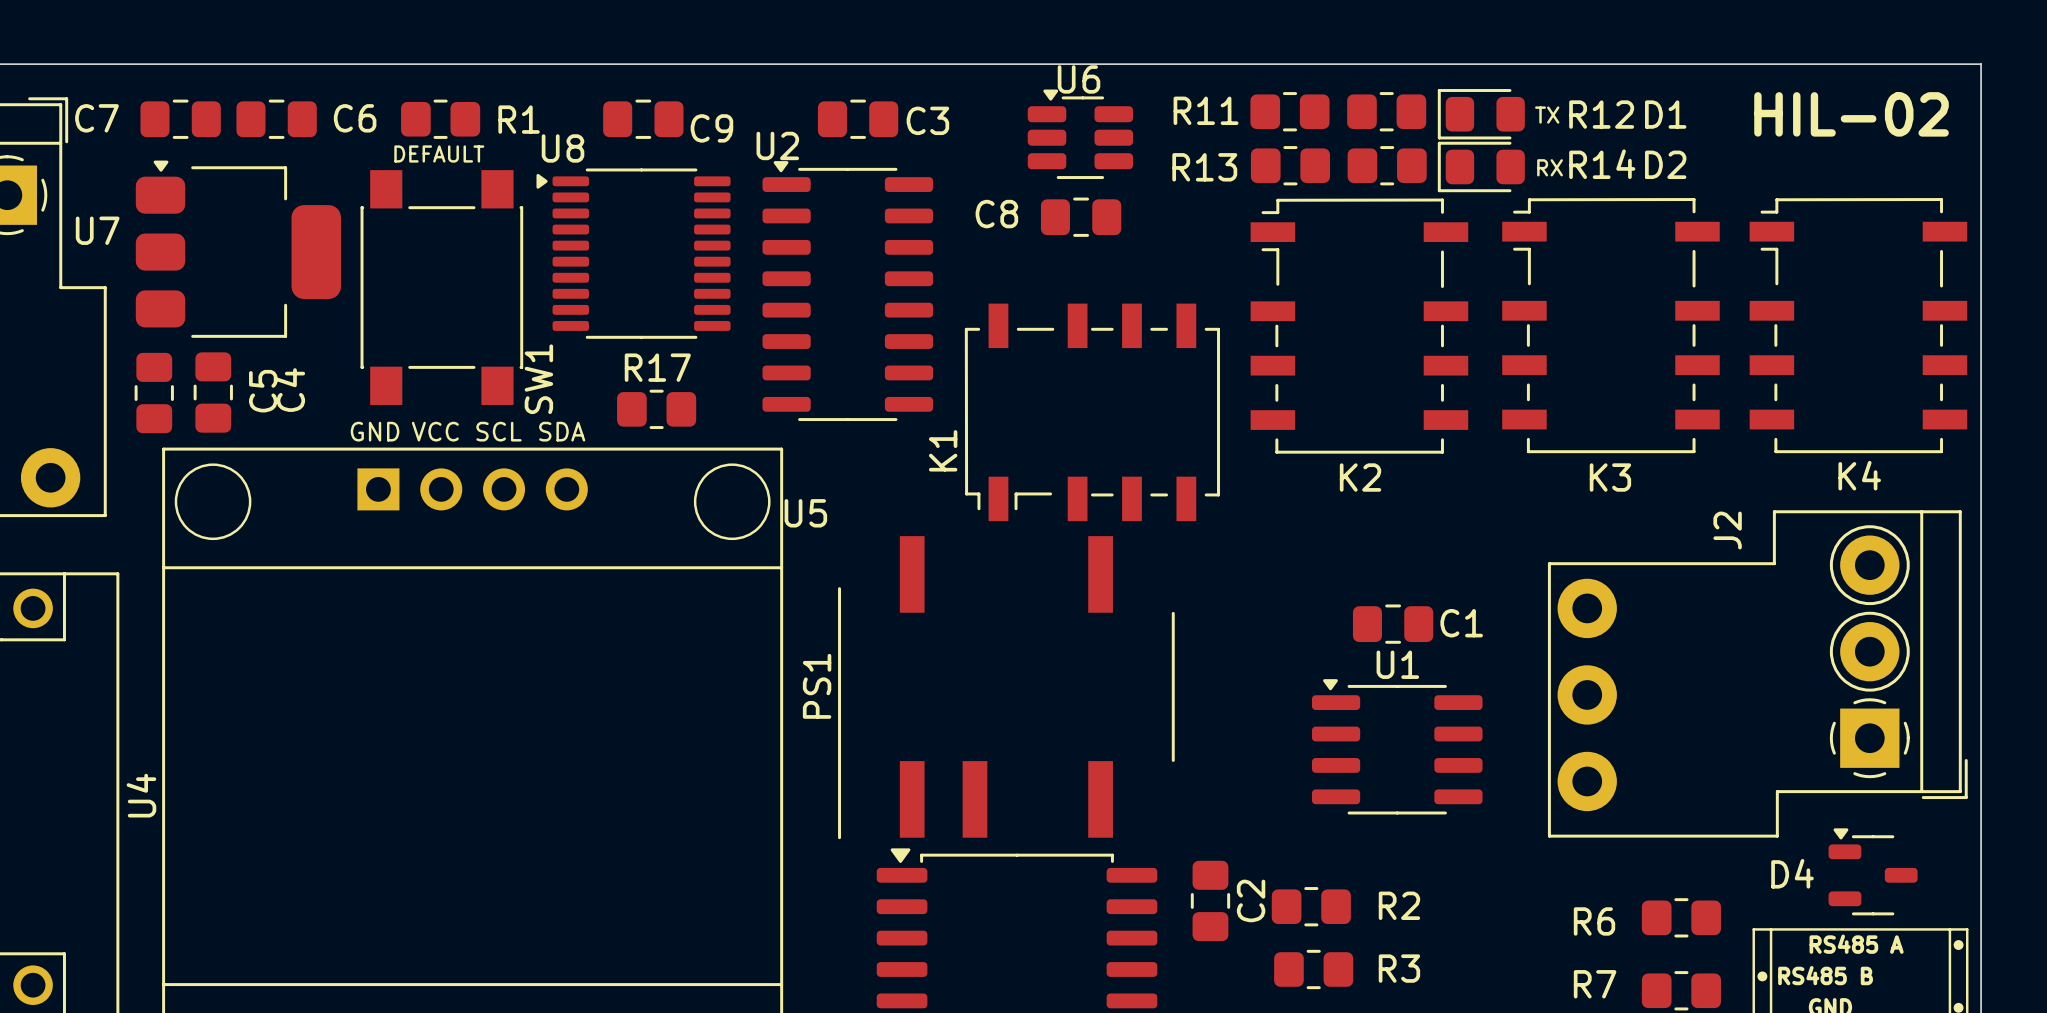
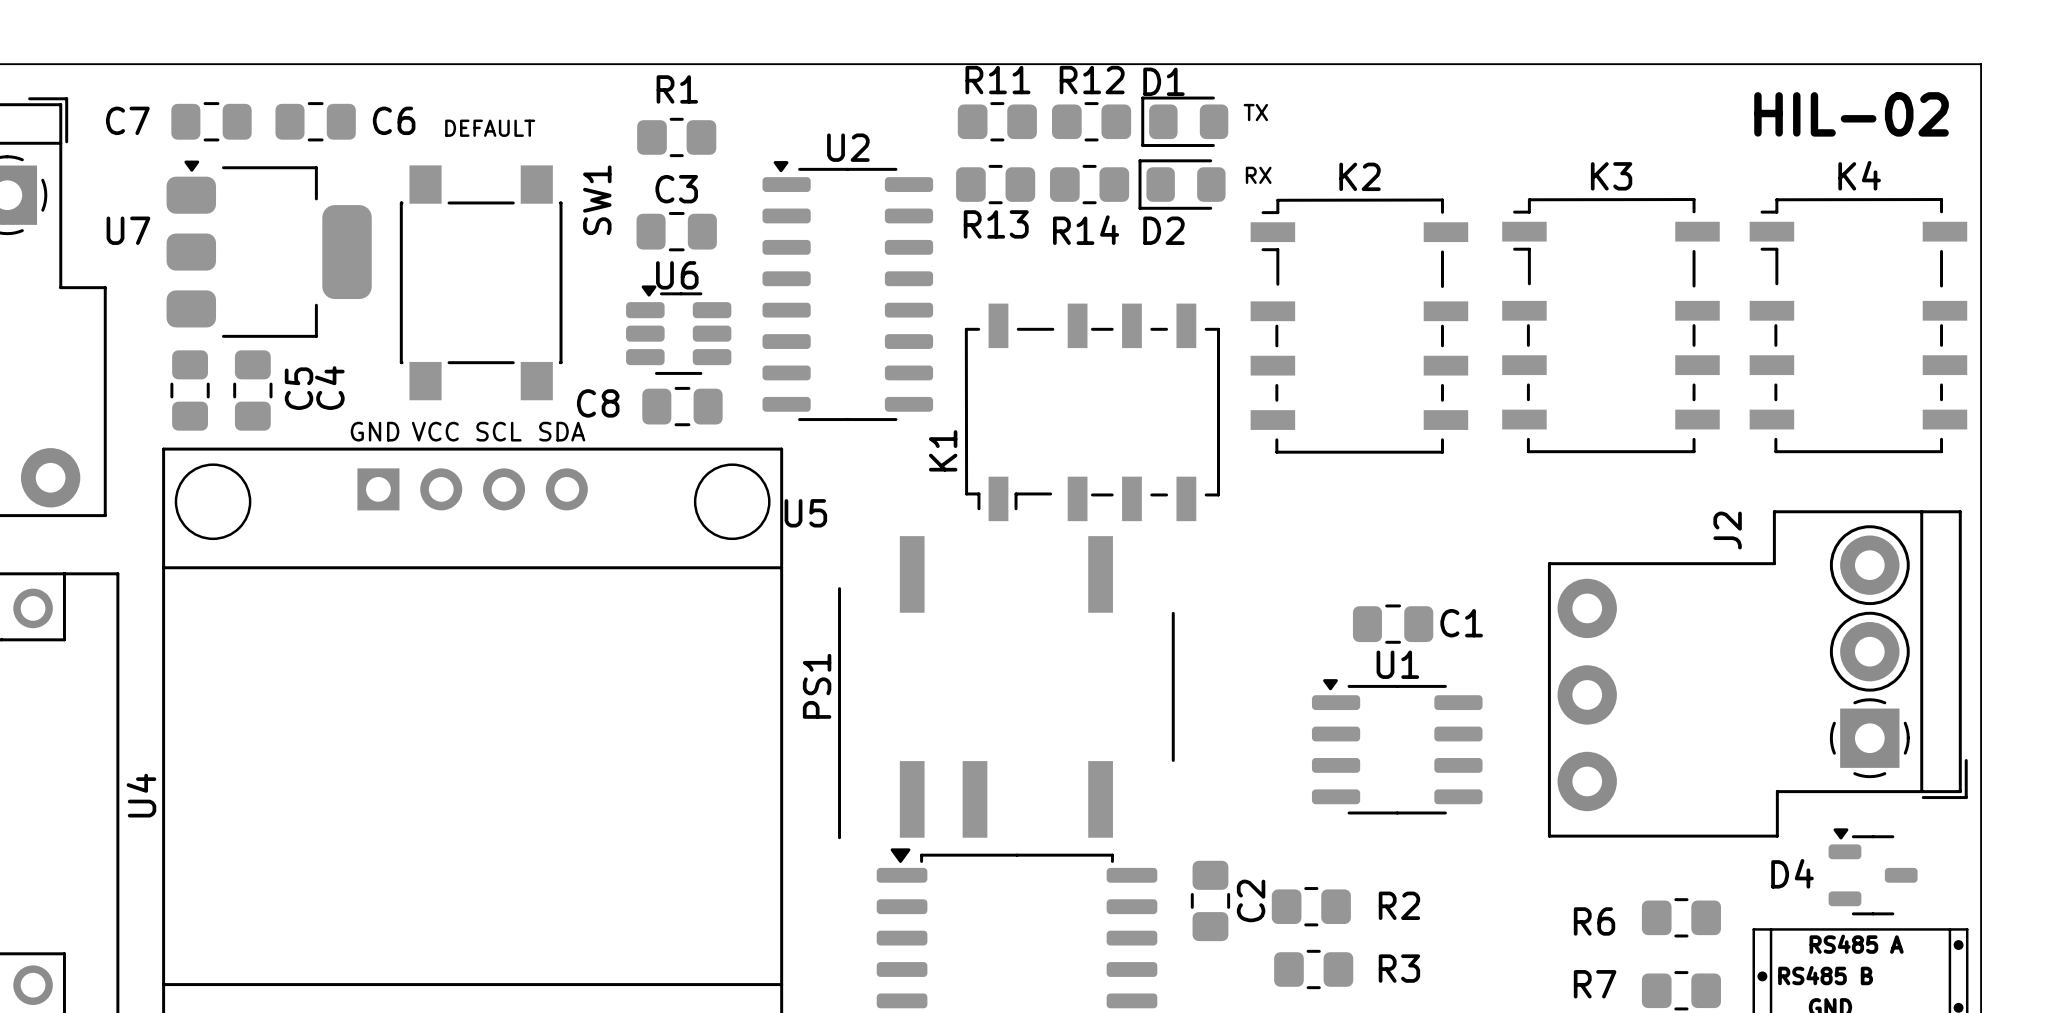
R11 name position: R11 (1206, 110) -> R11 (997, 80)
R11 position: (1289, 111) -> (997, 121)
R12 position: (1386, 111) -> (1091, 121)
D1 position: (1481, 114) -> (1184, 121)
R12 name position: R12 (1601, 114) -> R12 (1092, 80)
D1 name position: D1 (1665, 114) -> D1 (1163, 81)
text position: TX (1547, 115) -> TX (1255, 112)
C7 position: (180, 119) -> (211, 121)
C6 position: (276, 119) -> (315, 121)
R1 position: (440, 119) -> (676, 137)
R1 name position: R1 (519, 119) -> R1 (677, 89)
C9: (643, 119) -> none
C3 position: (858, 119) -> (676, 231)
C3 name position: C3 (927, 120) -> C3 (676, 189)
U6 position: (1080, 134) -> (678, 330)
U2 name position: U2 (777, 145) -> U2 (848, 147)
text position: DEFAULT (439, 153) -> DEFAULT (490, 128)
R14 name position: R14 (1602, 164) -> R14 (1086, 230)
D2 name position: D2 (1665, 164) -> D2 (1163, 230)
R13 position: (1290, 165) -> (995, 184)
R14 position: (1387, 165) -> (1089, 184)
D2 position: (1481, 166) -> (1182, 184)
R13 name position: R13 (1204, 167) -> R13 (996, 224)
text position: RX (1550, 167) -> RX (1258, 175)
C8 position: (1081, 217) -> (682, 406)
U7 position: (238, 249) -> (269, 249)
U8: (633, 253) -> none
SW1 position: (441, 287) -> (481, 282)
SW1 name position: SW1 (538, 379) -> SW1 (597, 200)
C4 position: (213, 392) -> (252, 390)
C5 position: (154, 393) -> (190, 390)
R17: (656, 409) -> none
K4 name position: K4 (1859, 475) -> K4 (1859, 175)
K2 name position: K2 (1360, 477) -> K2 (1360, 176)
K3 name position: K3 (1610, 477) -> K3 (1611, 176)

